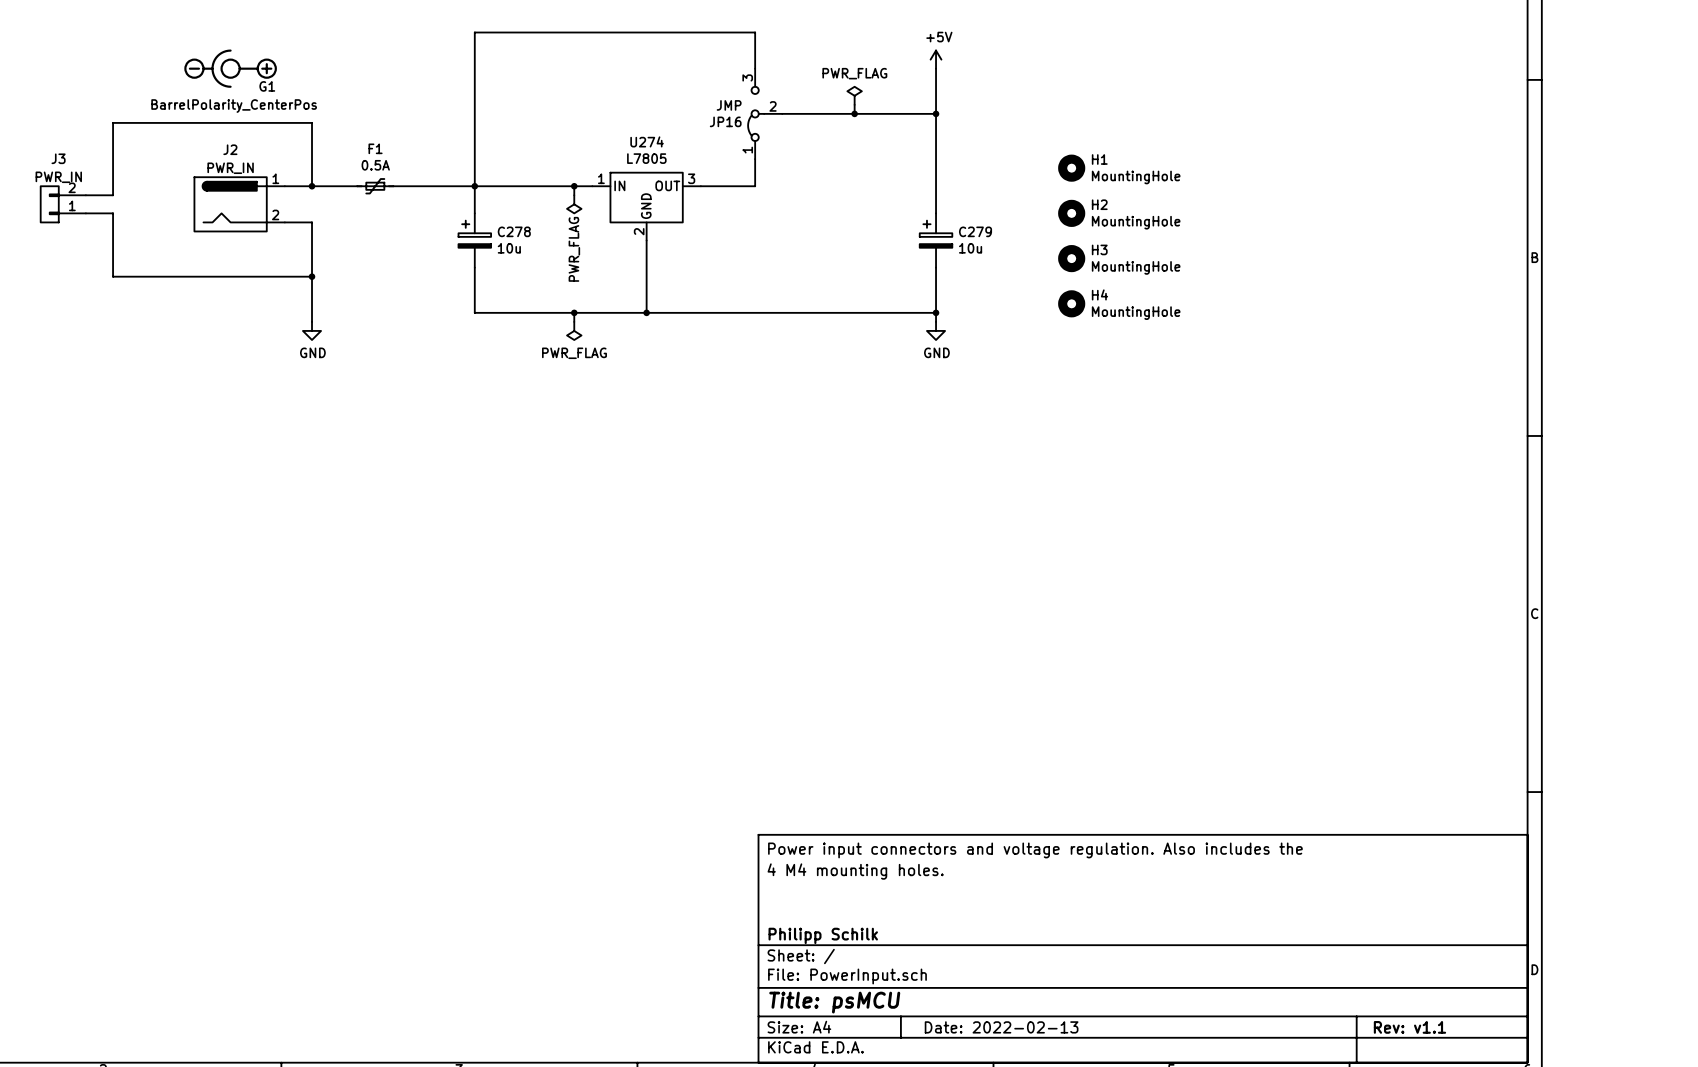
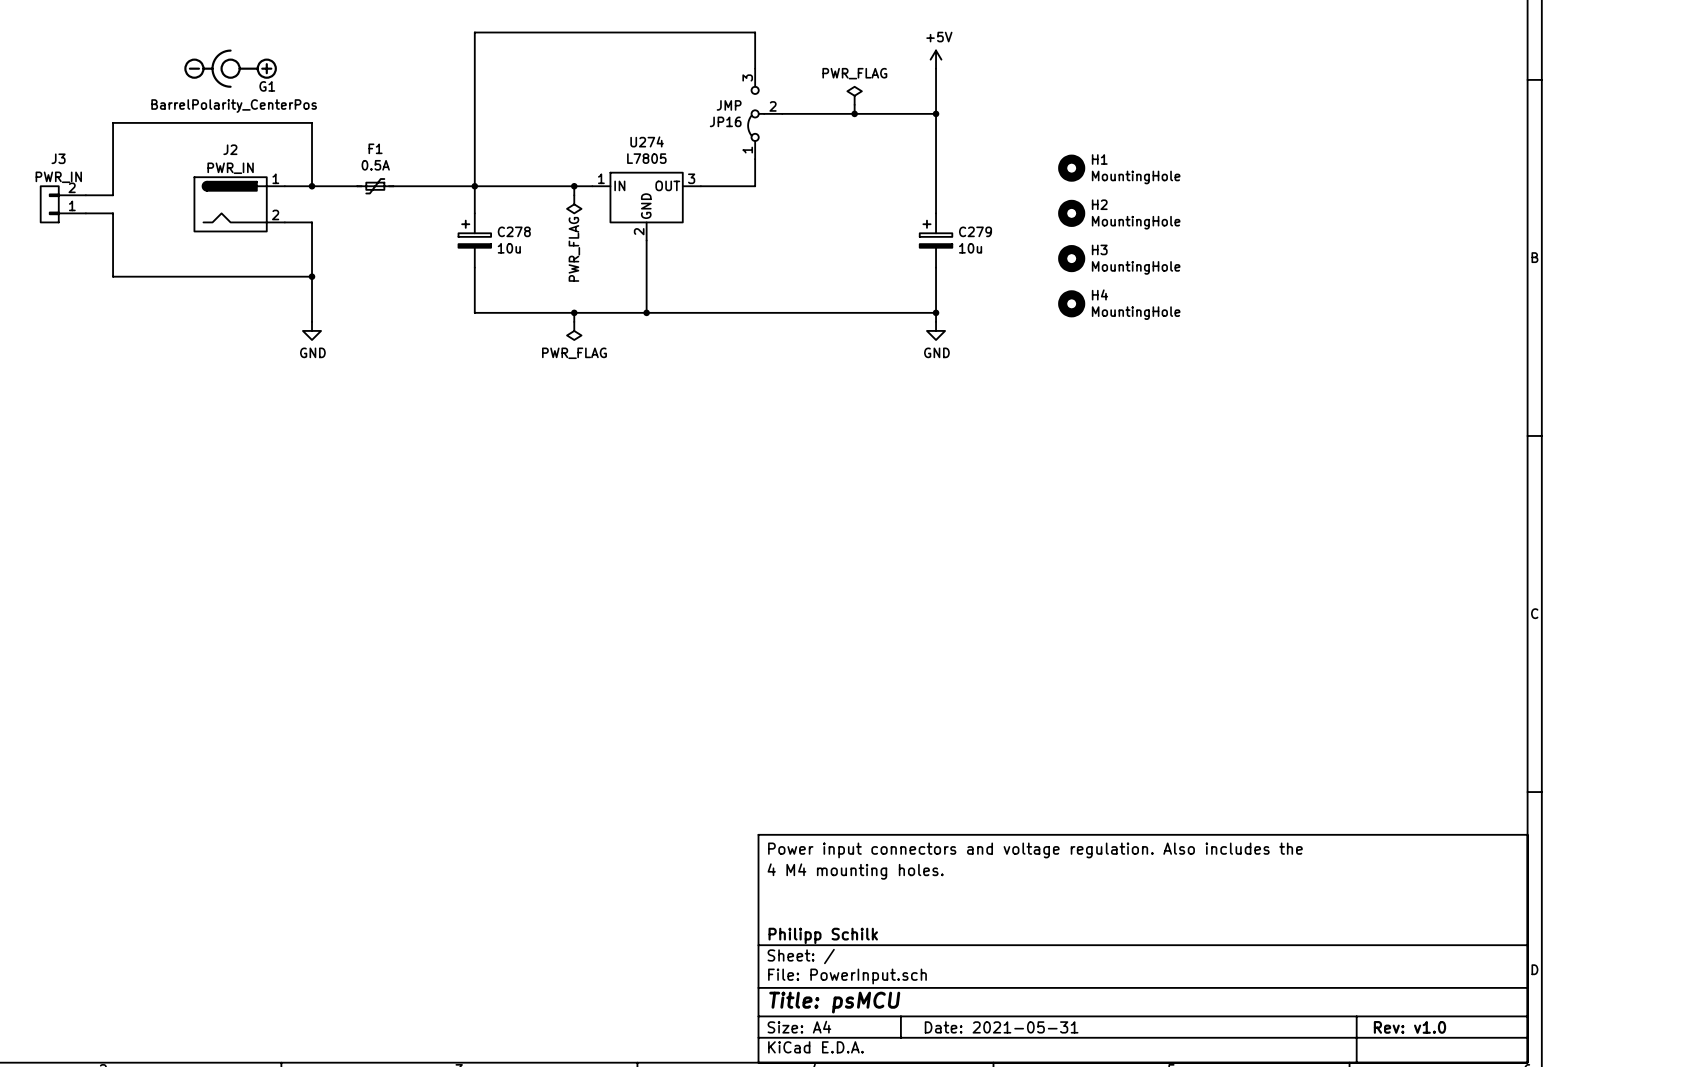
title block: Date: 2022-02-13 (1001, 1027) -> Date: 2021-05-31 (1001, 1027)
title block: Rev: v1.1 (1409, 1027) -> Rev: v1.0 (1409, 1027)

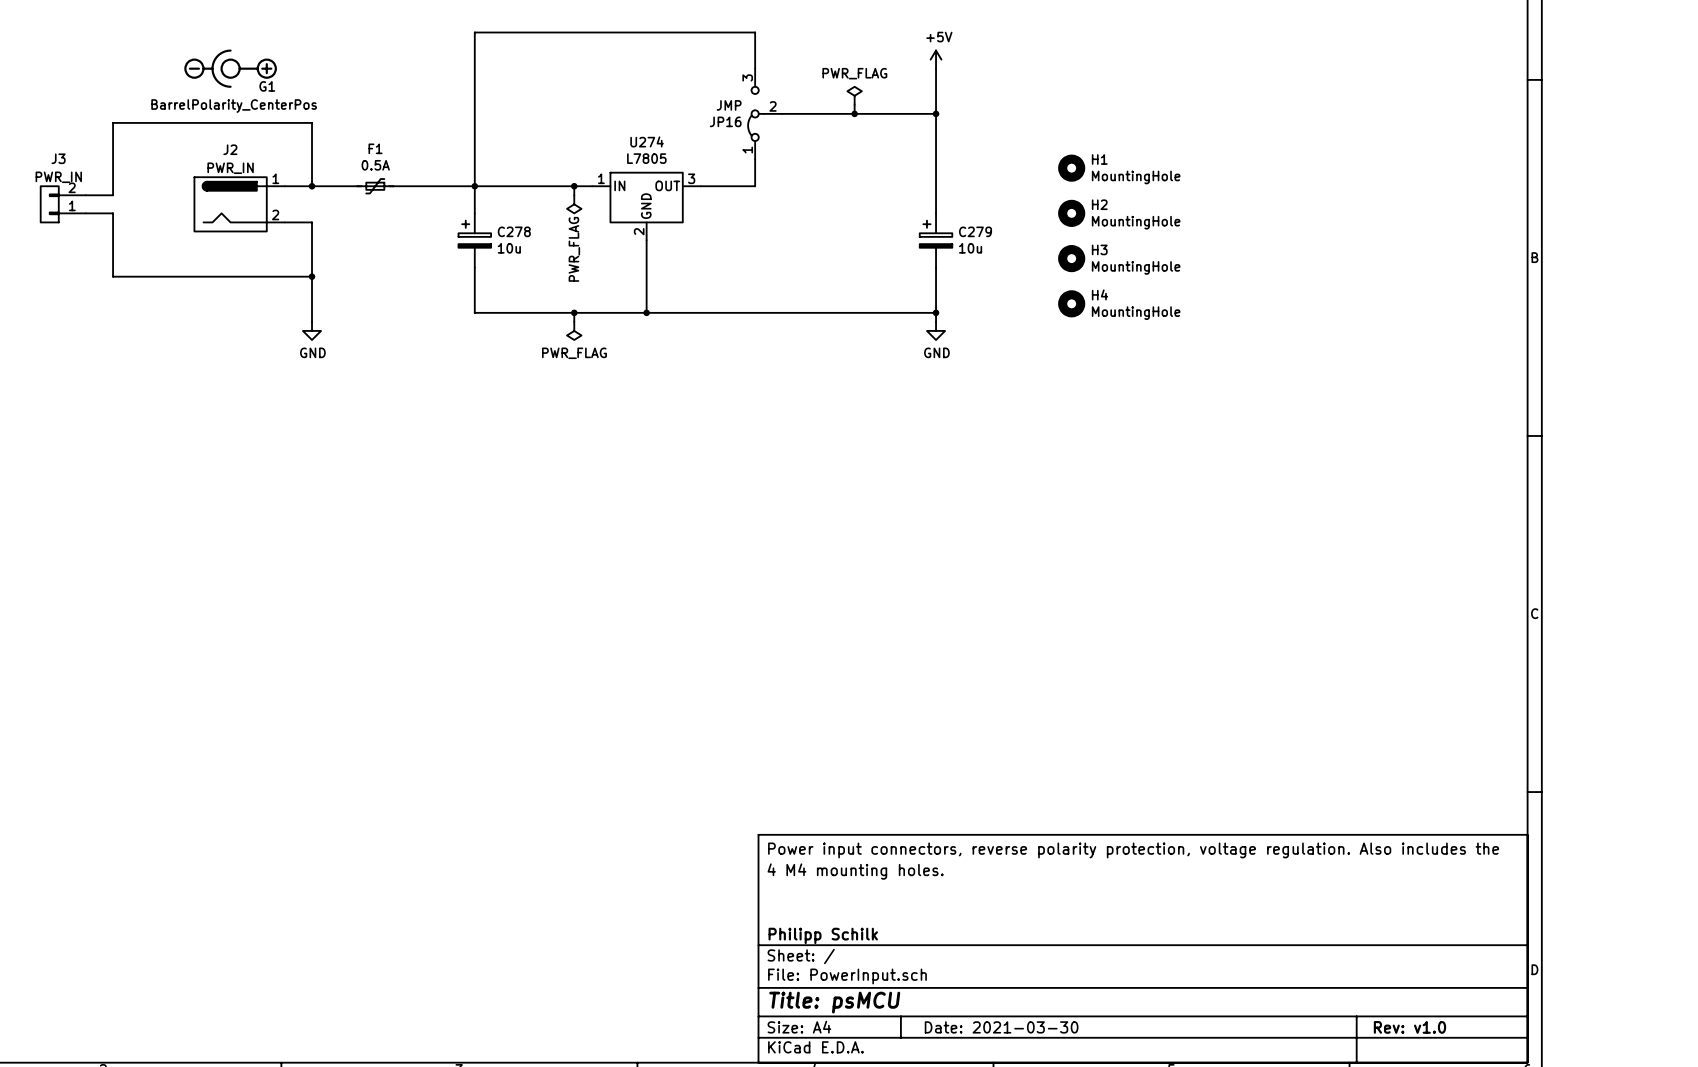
title block: Power input connectors and voltage regulation. Also includes the (1035, 850) -> Power input connectors, reverse polarity protection, voltage regulation. Also includes the (1133, 850)
title block: Date: 2021-05-31 (1001, 1027) -> Date: 2021-03-30 (1001, 1027)

